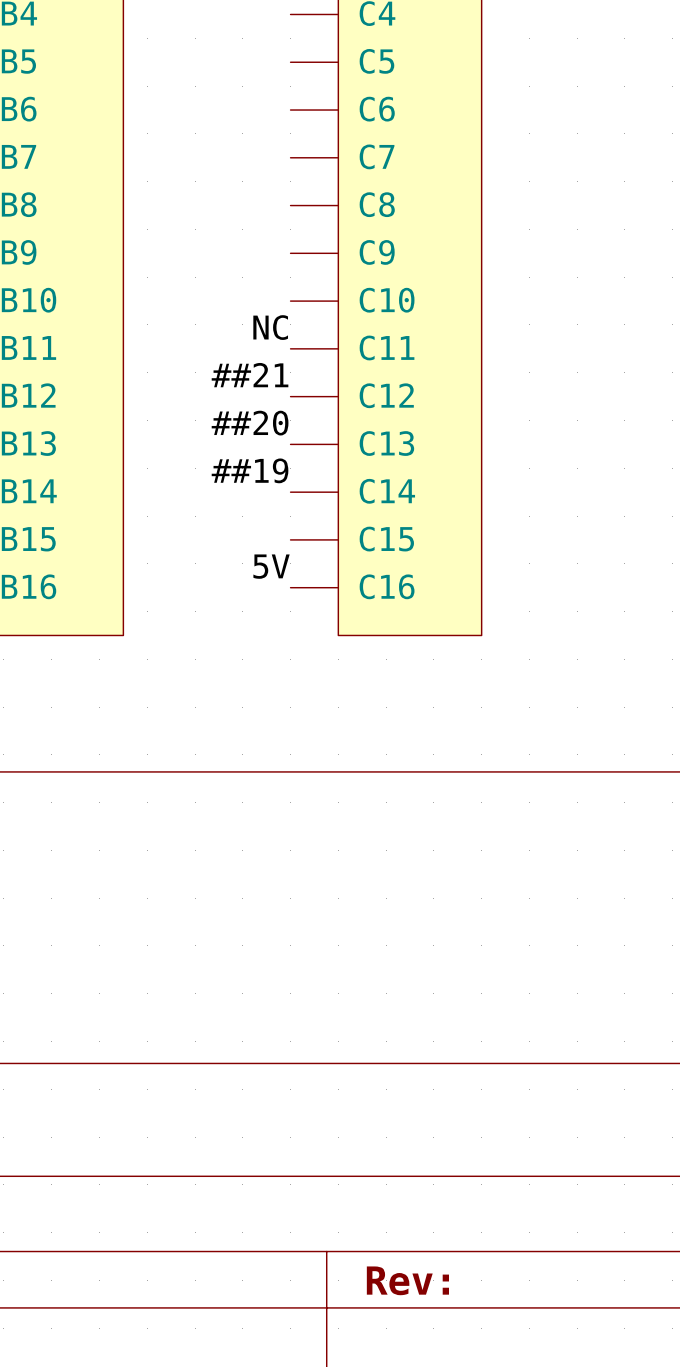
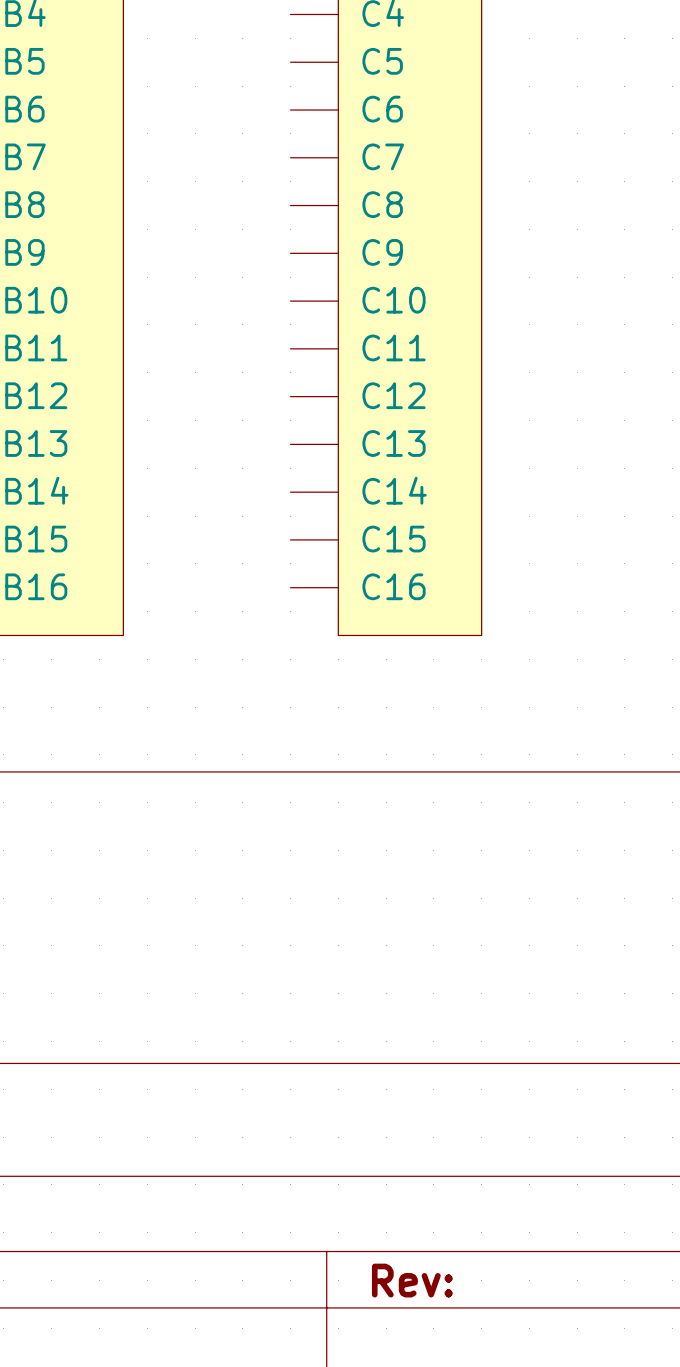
label: NC (270, 327) -> none
label: ##21 (250, 375) -> none
label: ##20 (250, 423) -> none
label: ##19 (250, 470) -> none
label: 5V (271, 566) -> none

